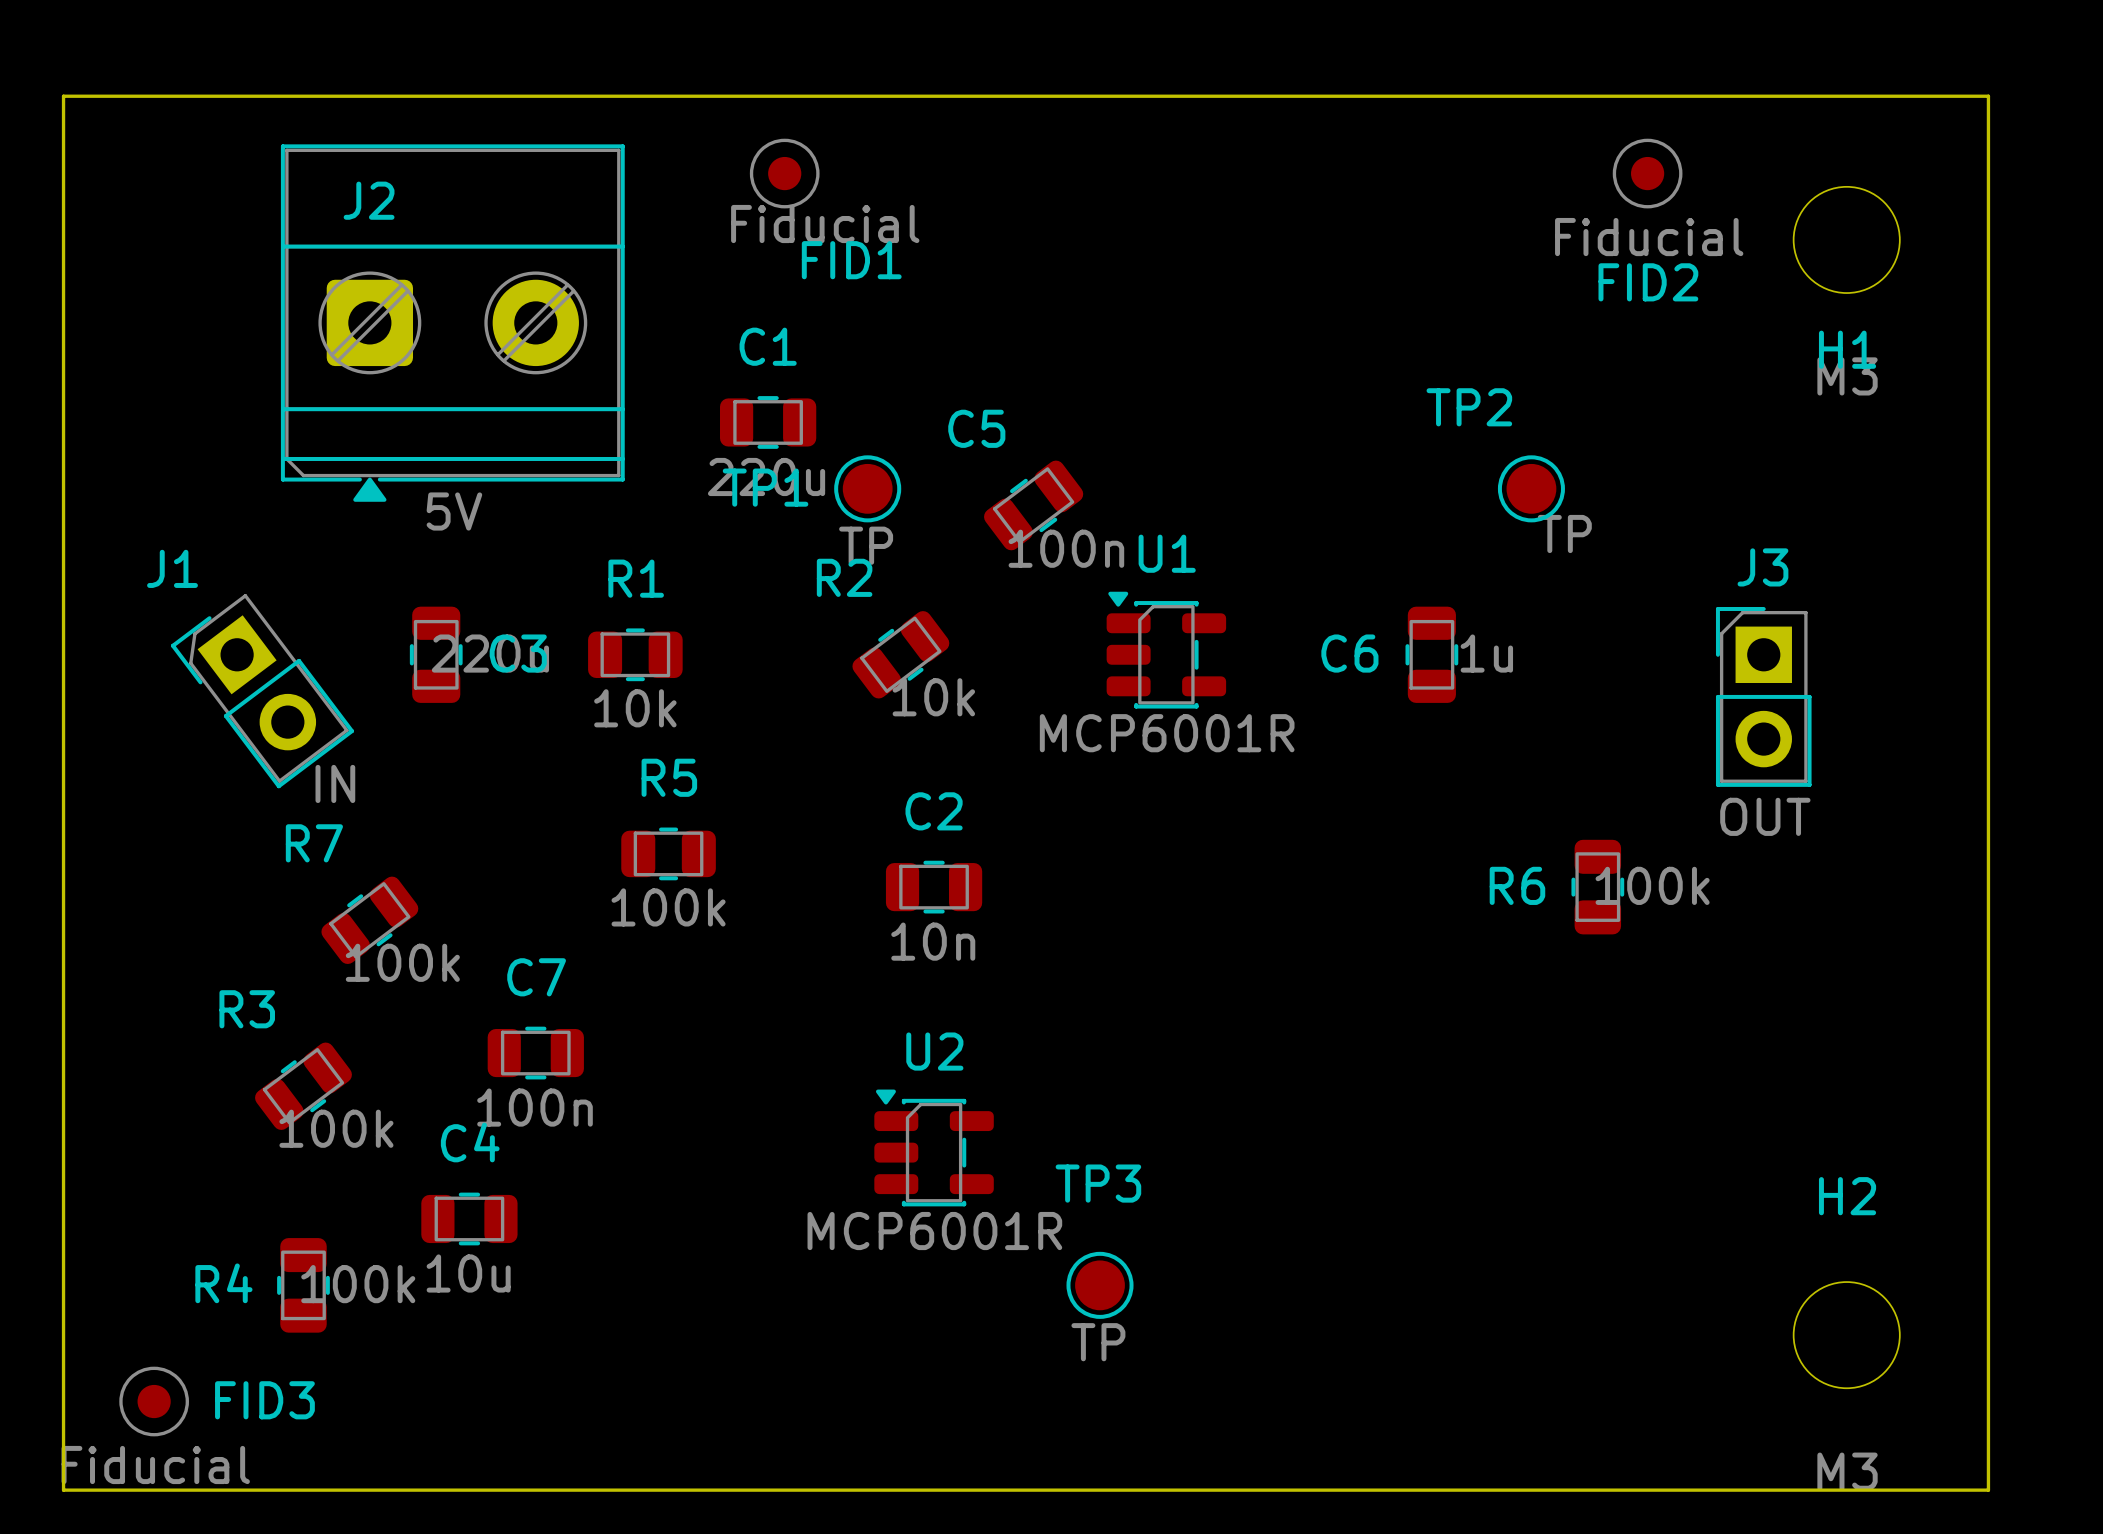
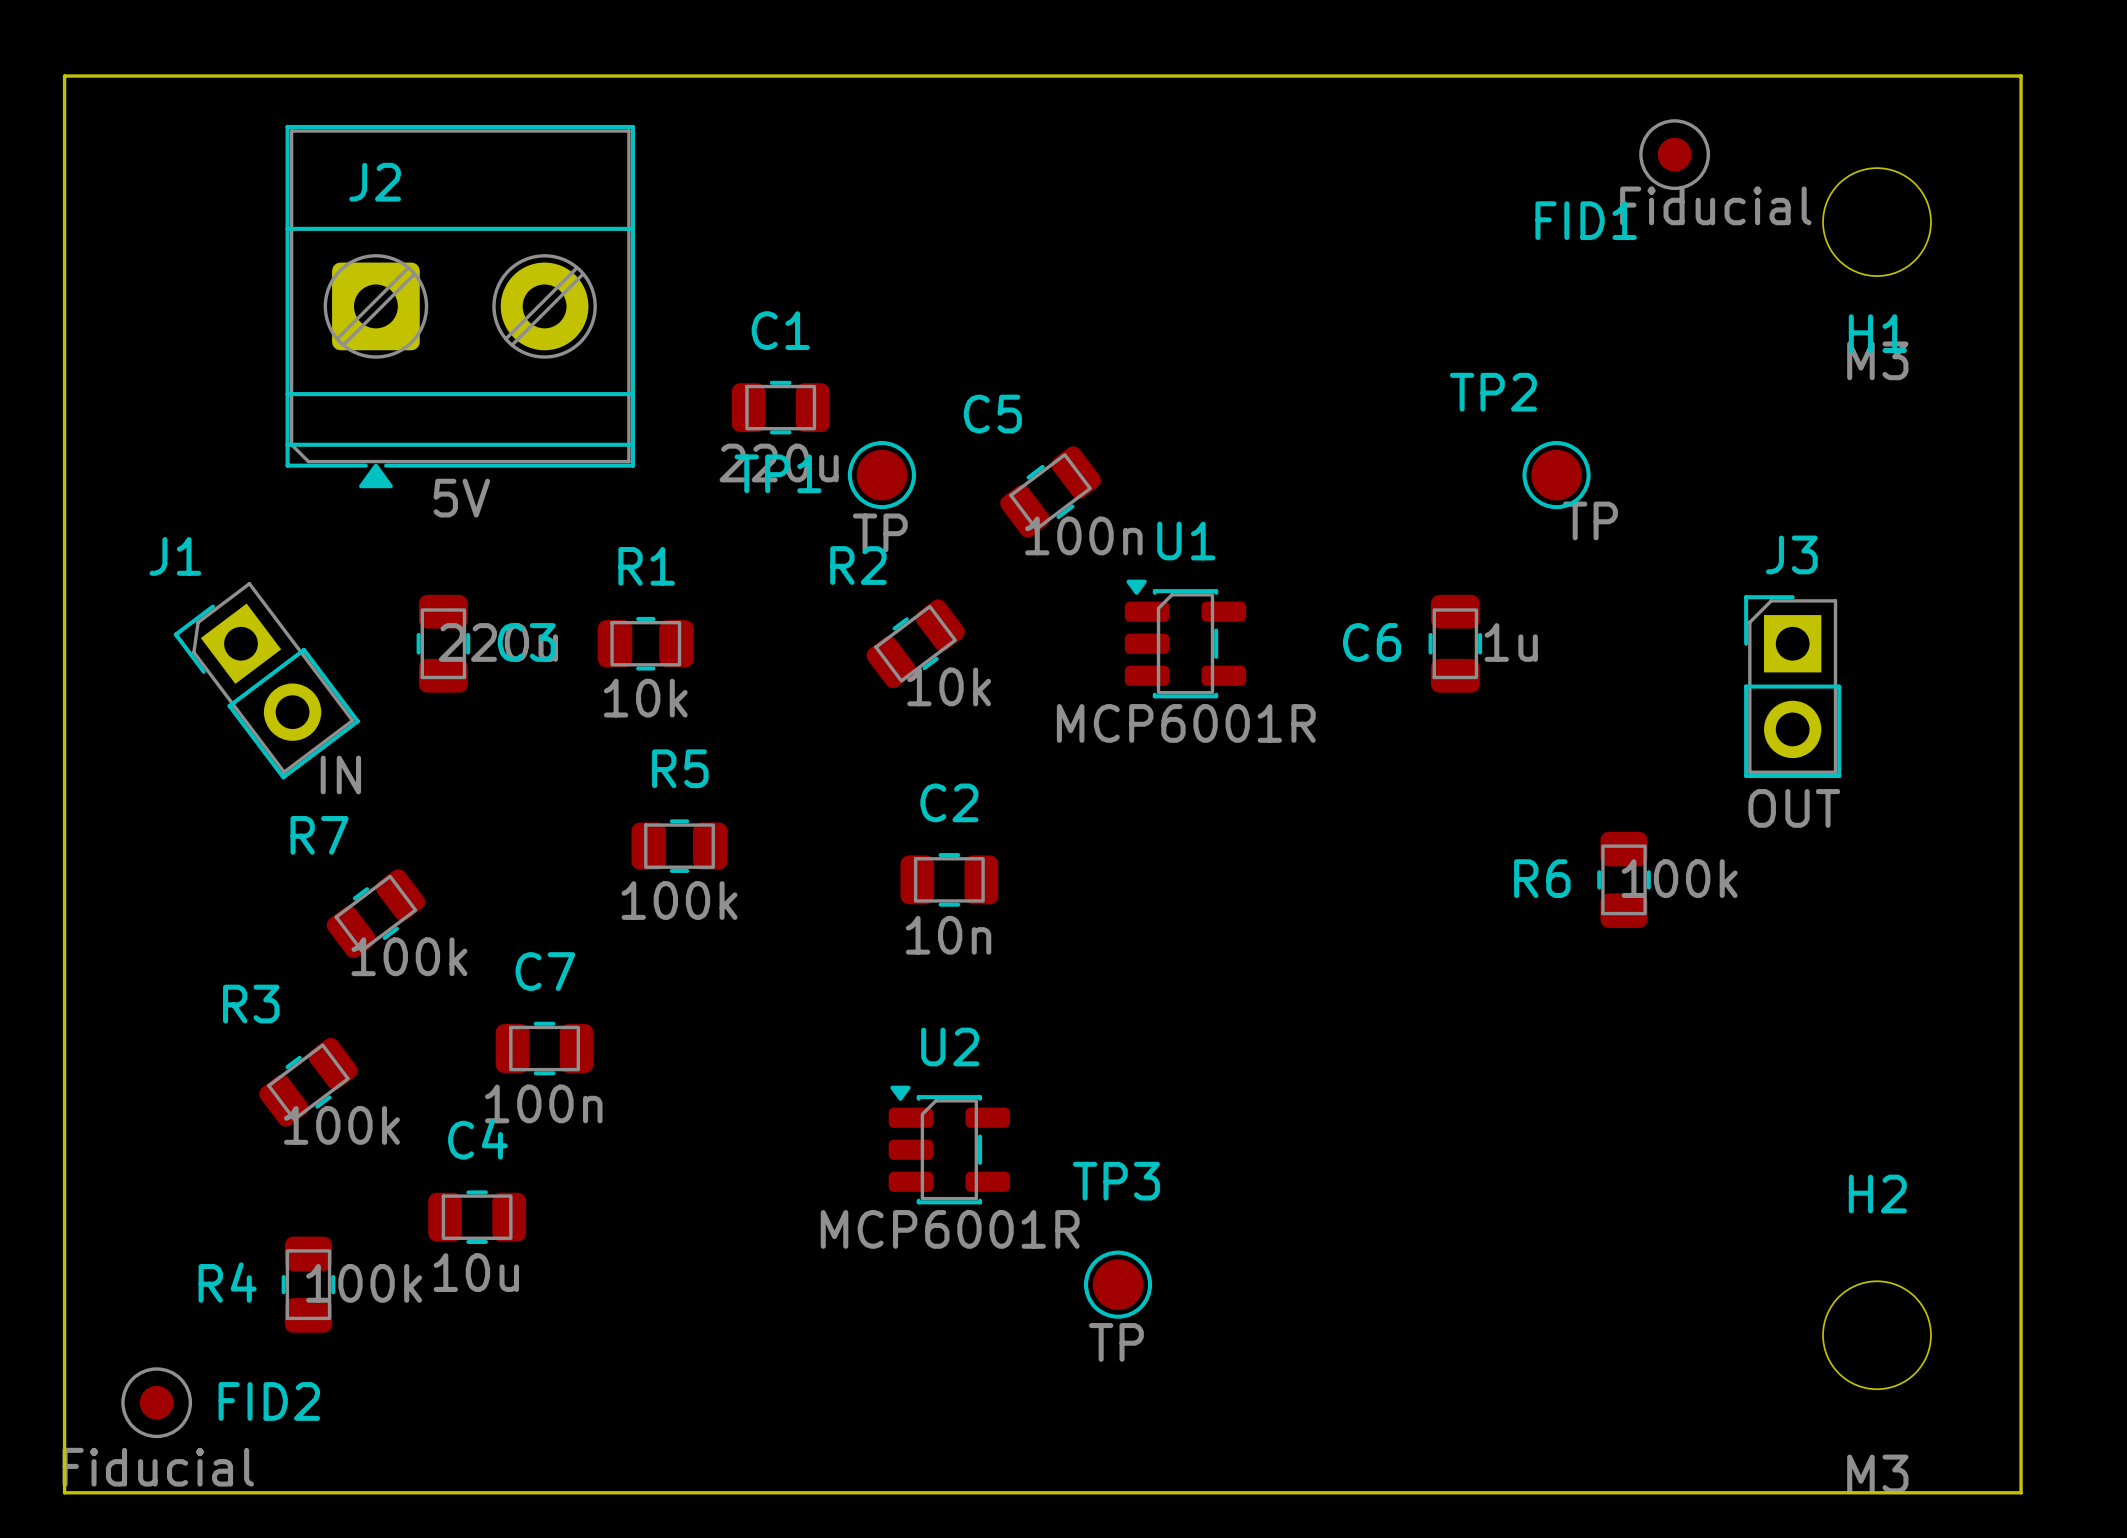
FID1: Fiducial (784, 173) -> none
FID2 value position: Fiducial (1649, 237) -> Fiducial (1715, 205)
FID2 name: FID2 (1648, 282) -> FID1 (1586, 220)
FID3 name: FID3 (264, 1400) -> FID2 (269, 1401)

